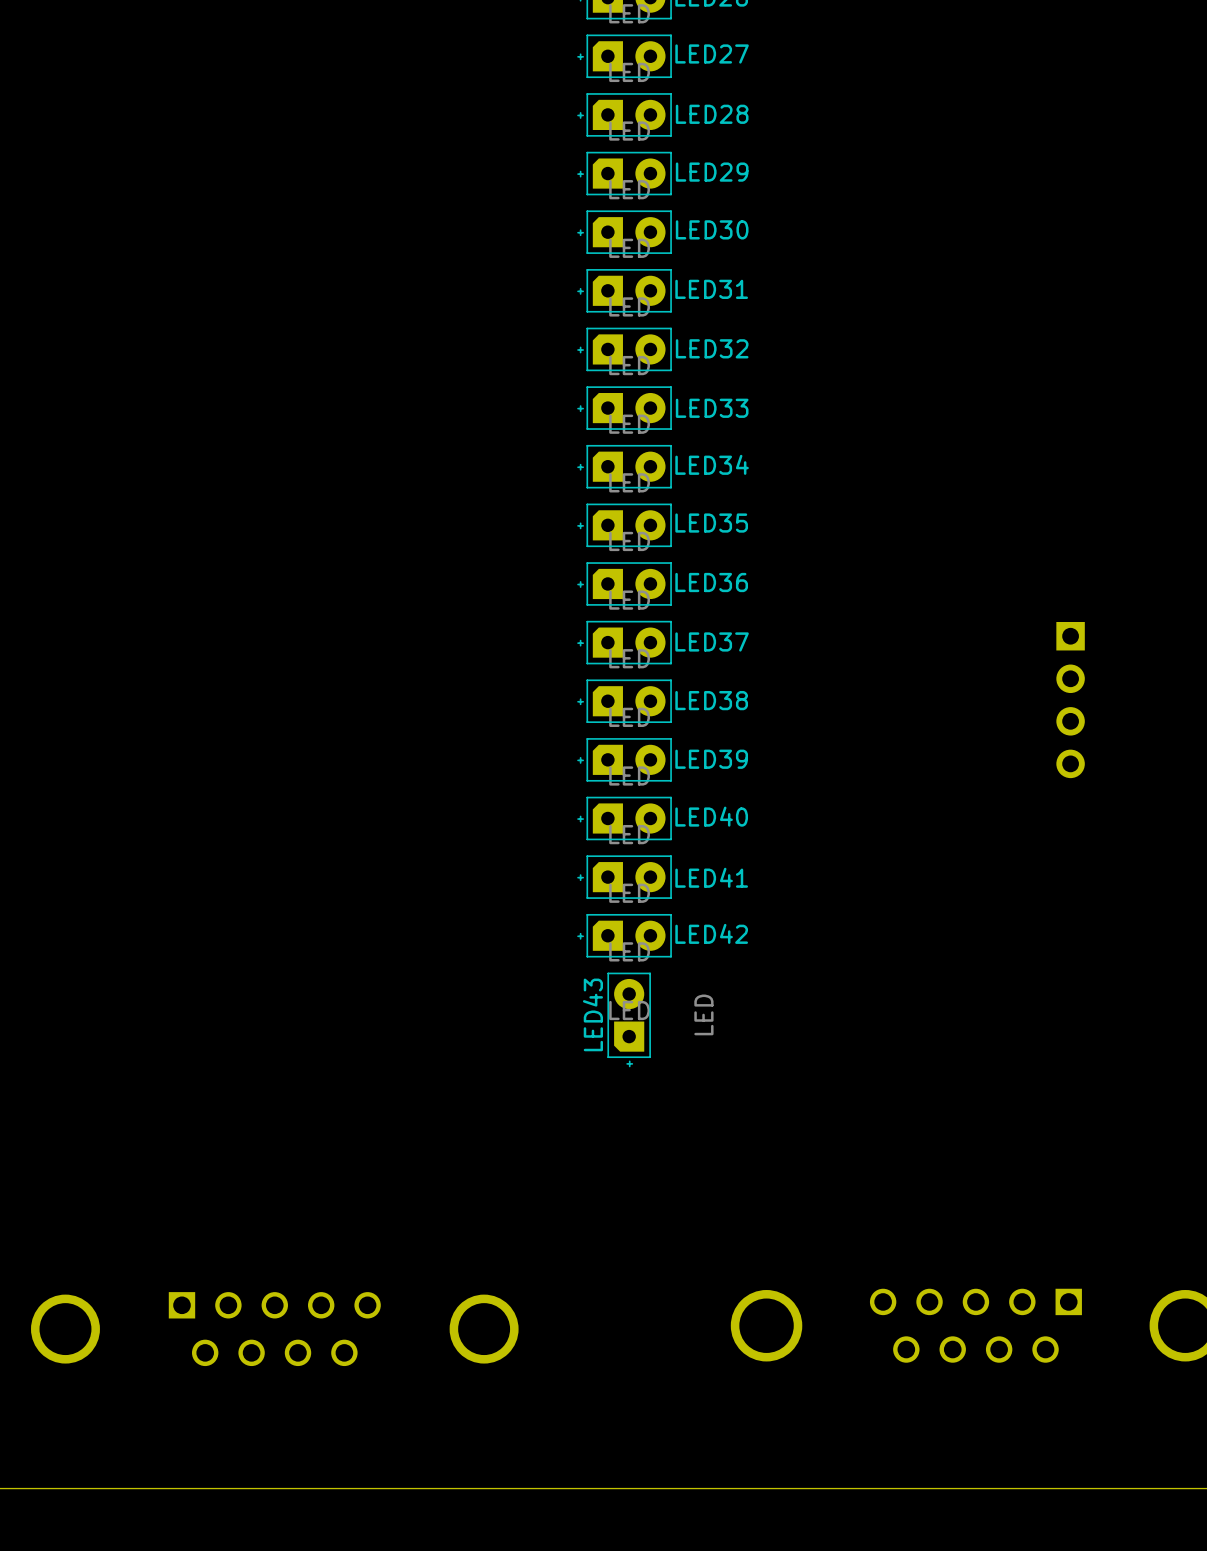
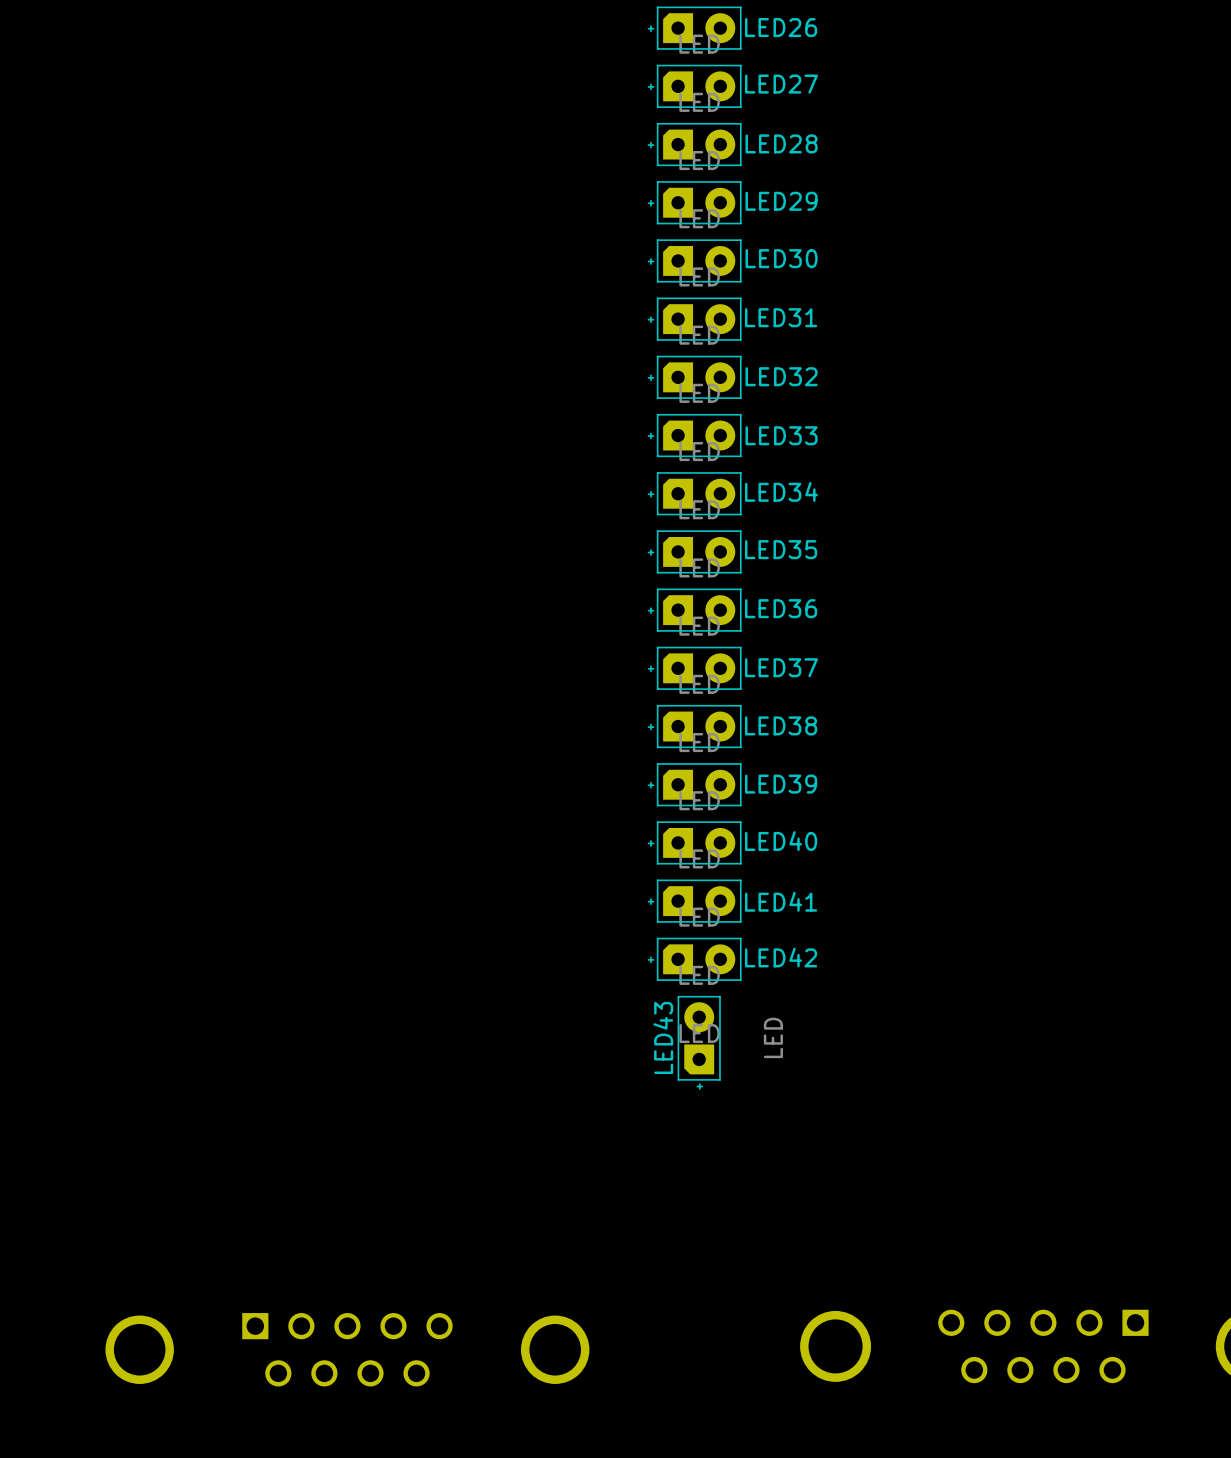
part: (1070, 700) -> none

